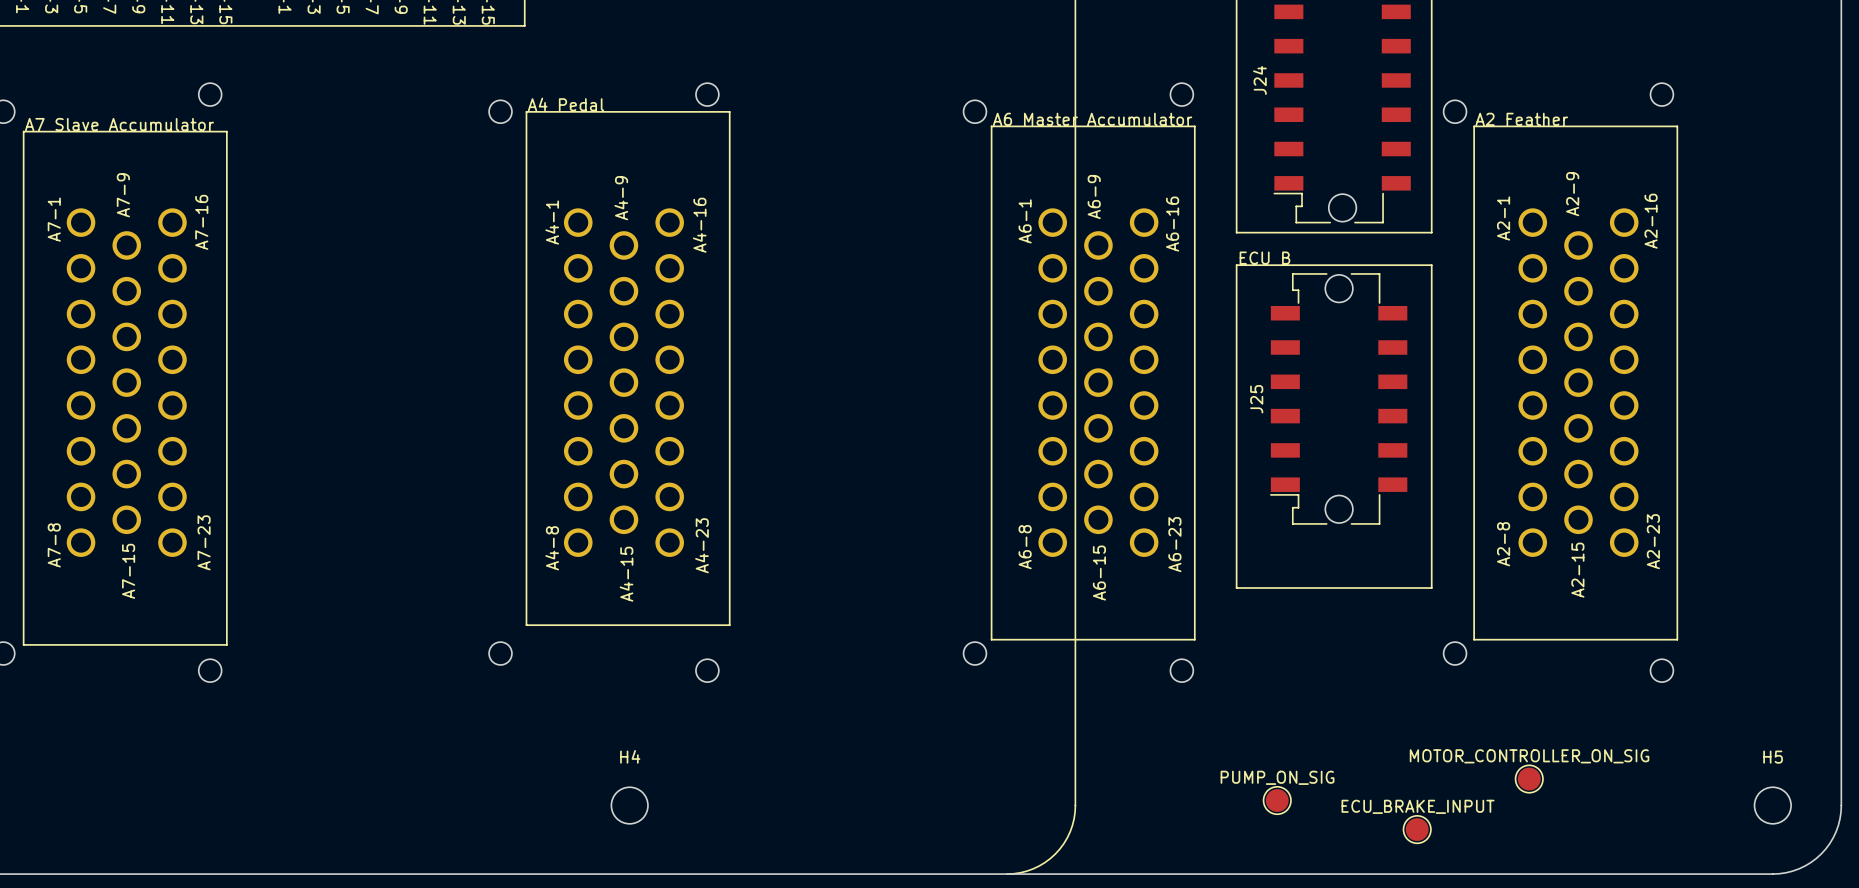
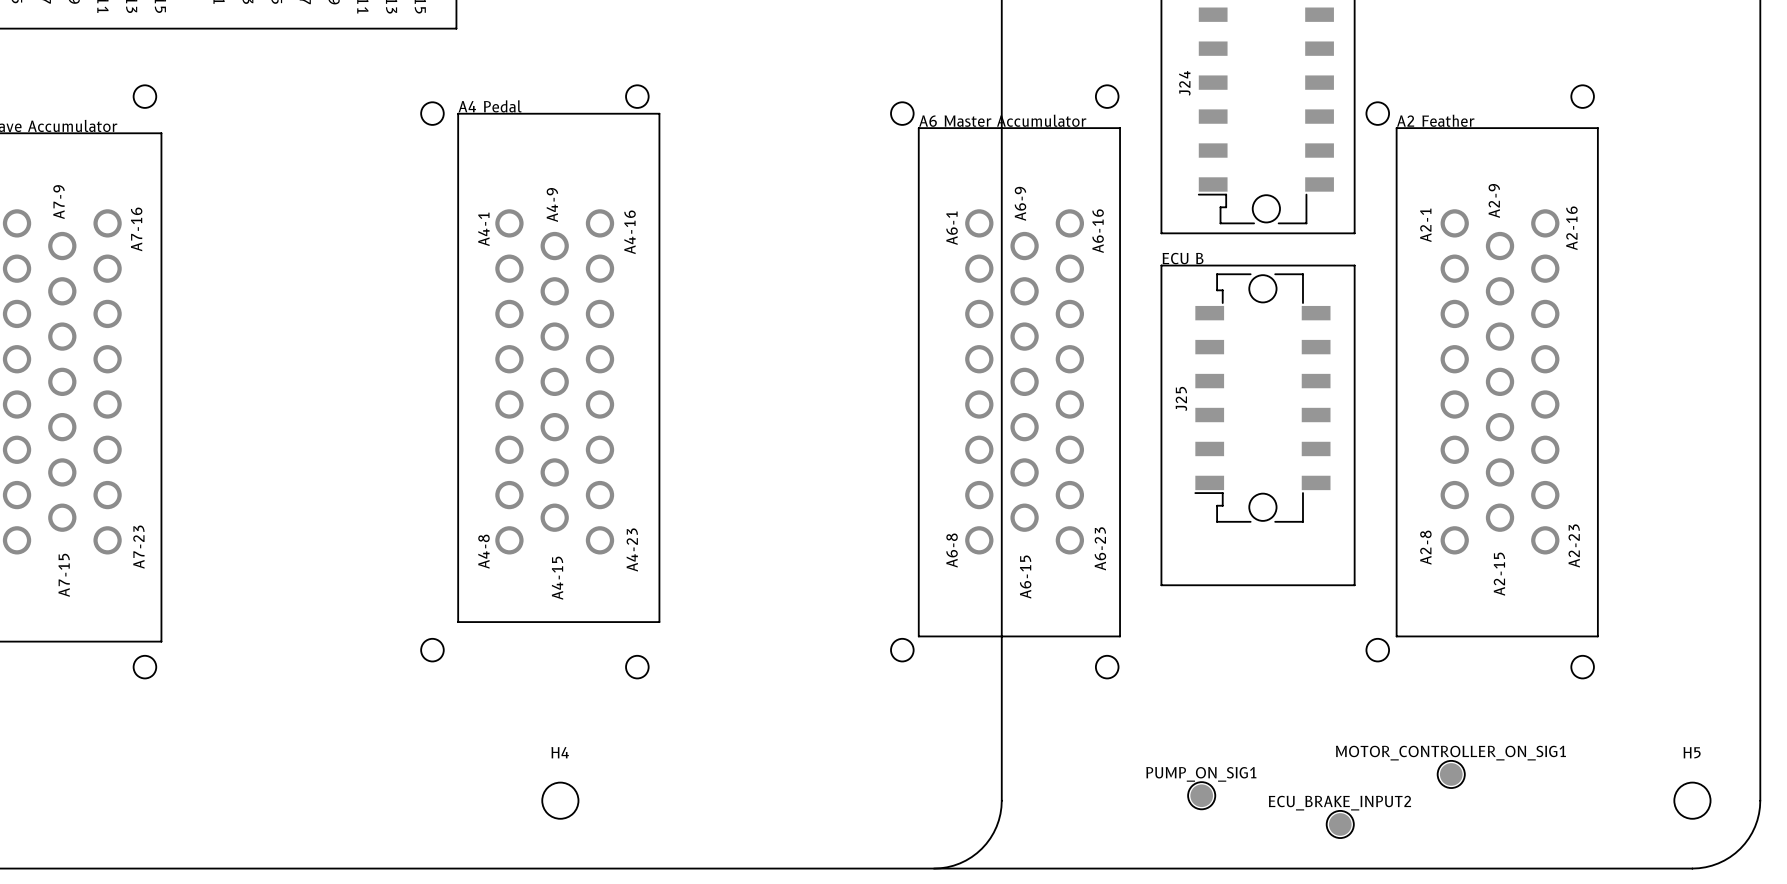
MOTOR_CONTROLLER_ON_SIG name: MOTOR_CONTROLLER_ON_SIG (1529, 756) -> MOTOR_CONTROLLER_ON_SIG1 (1450, 753)
PUMP_ON_SIG name: PUMP_ON_SIG (1277, 777) -> PUMP_ON_SIG1 (1201, 774)
ECU_BRAKE_INPUT name: ECU_BRAKE_INPUT (1418, 806) -> ECU_BRAKE_INPUT2 (1339, 803)

